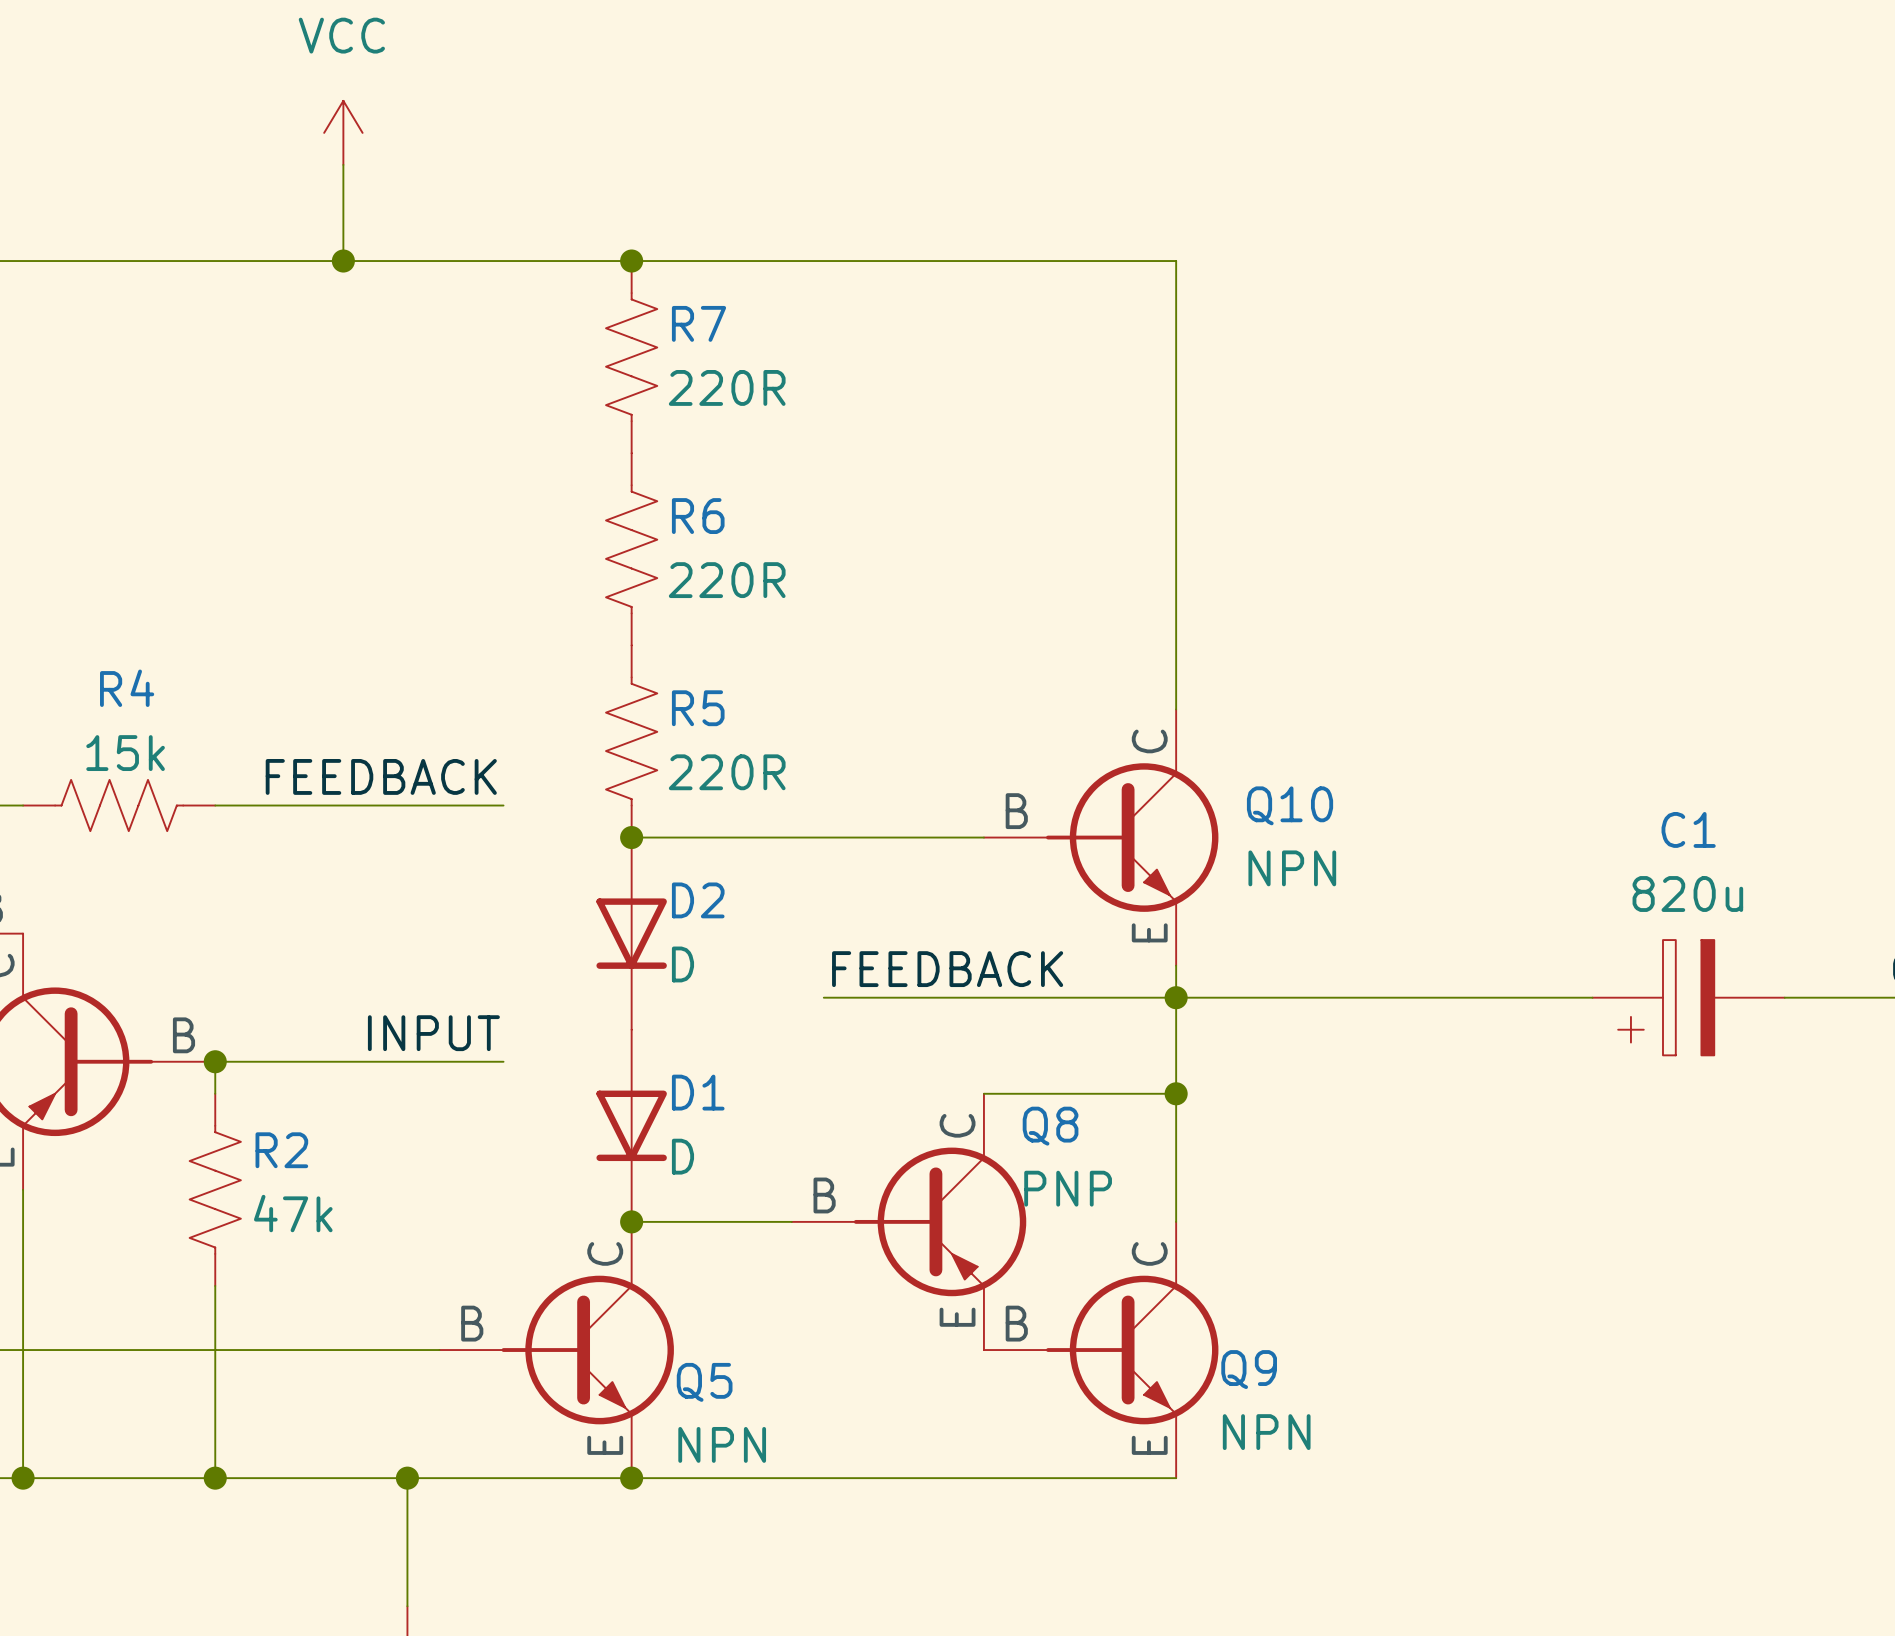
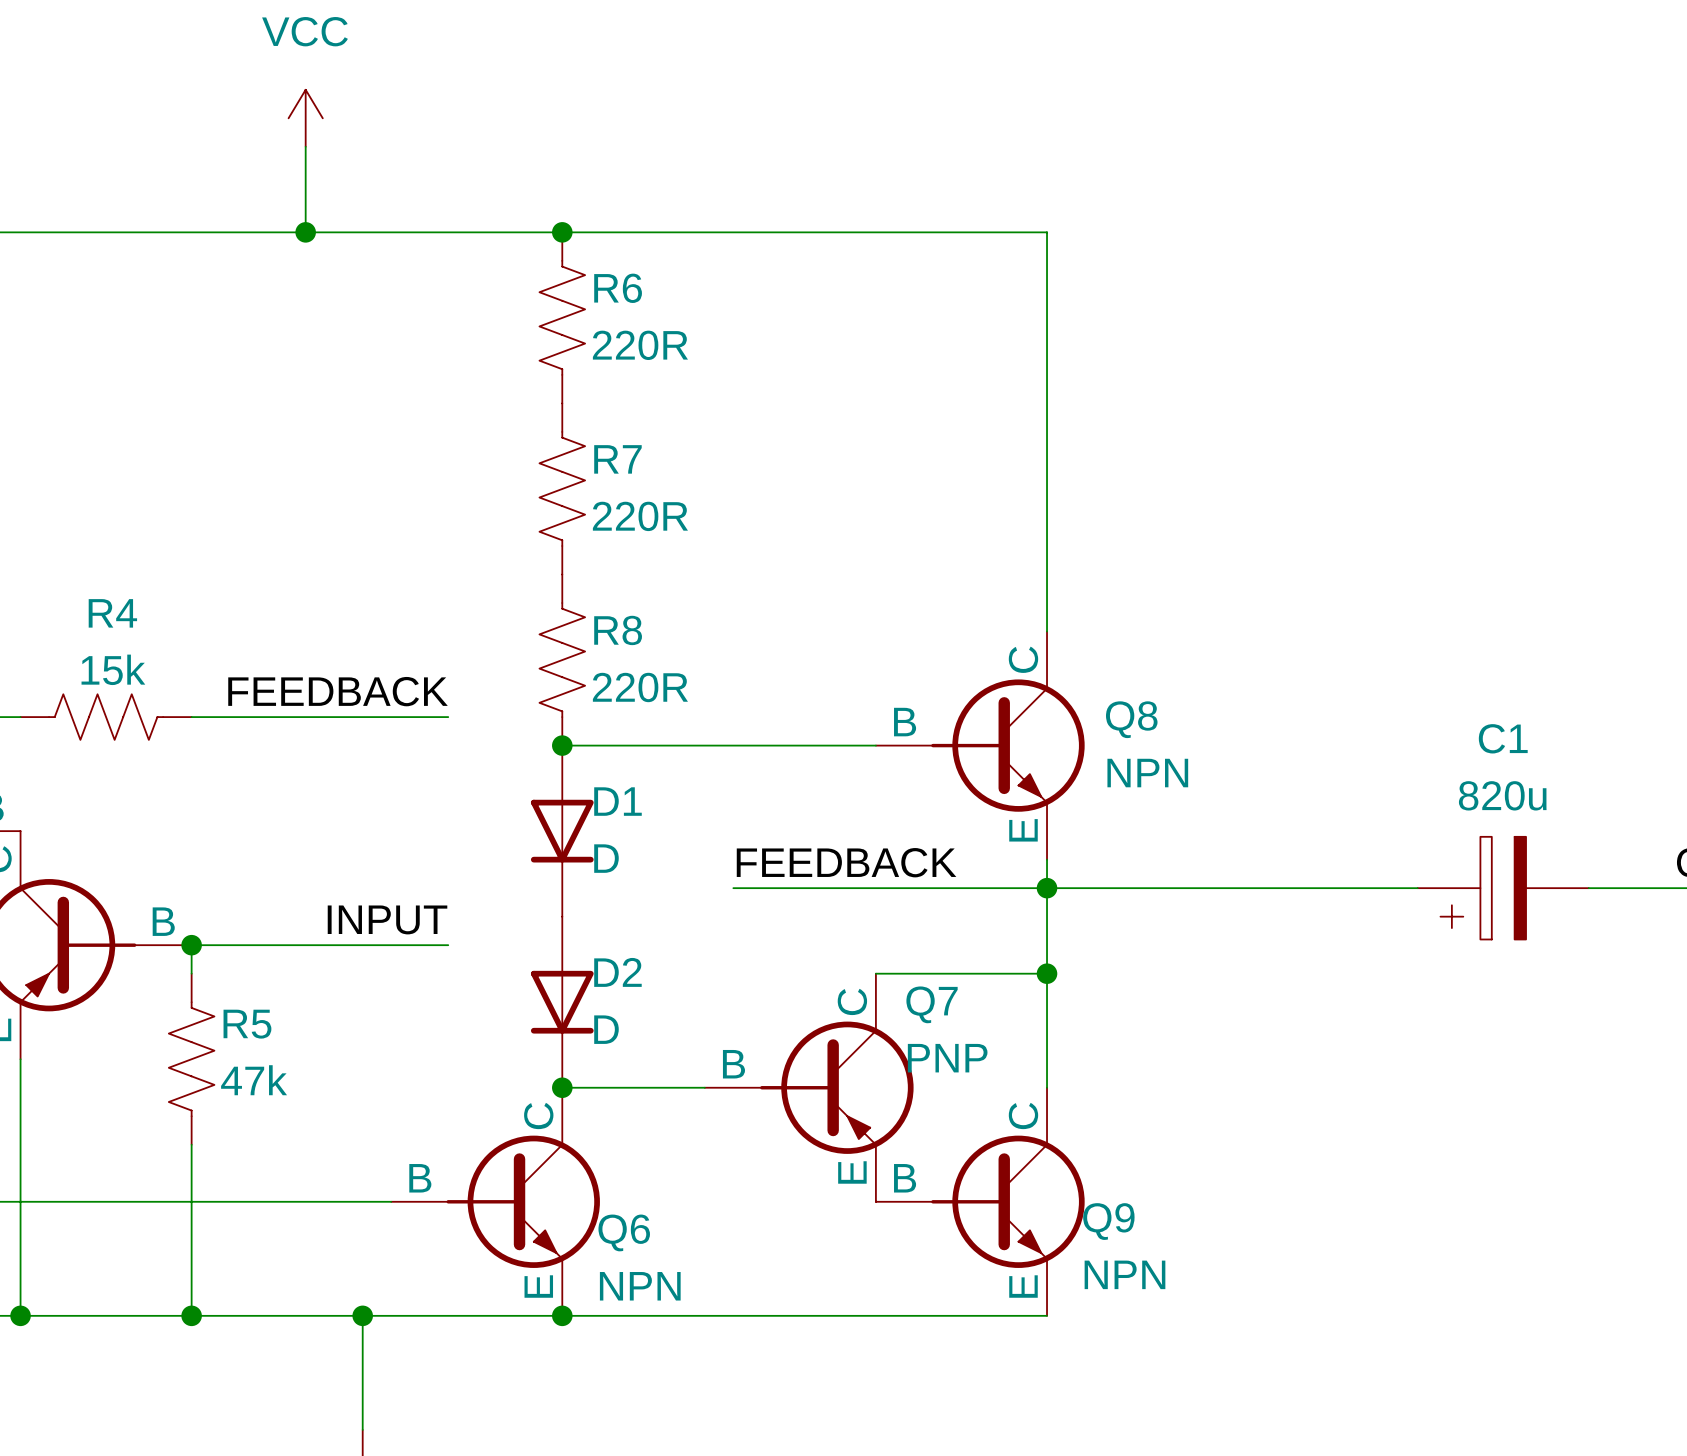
R7 name: R7 (698, 323) -> R6 (618, 288)
R6 name: R6 (698, 516) -> R7 (617, 459)
R5 name: R5 (698, 708) -> R8 (618, 630)
Q10 name: Q10 (1290, 805) -> Q8 (1131, 719)
D2 name: D2 (698, 900) -> D1 (617, 801)
D1 name: D1 (698, 1092) -> D2 (617, 972)
Q8 name: Q8 (1050, 1126) -> Q7 (932, 1004)
R2 name: R2 (281, 1150) -> R5 (247, 1024)
Q5 name: Q5 (704, 1382) -> Q6 (624, 1232)

